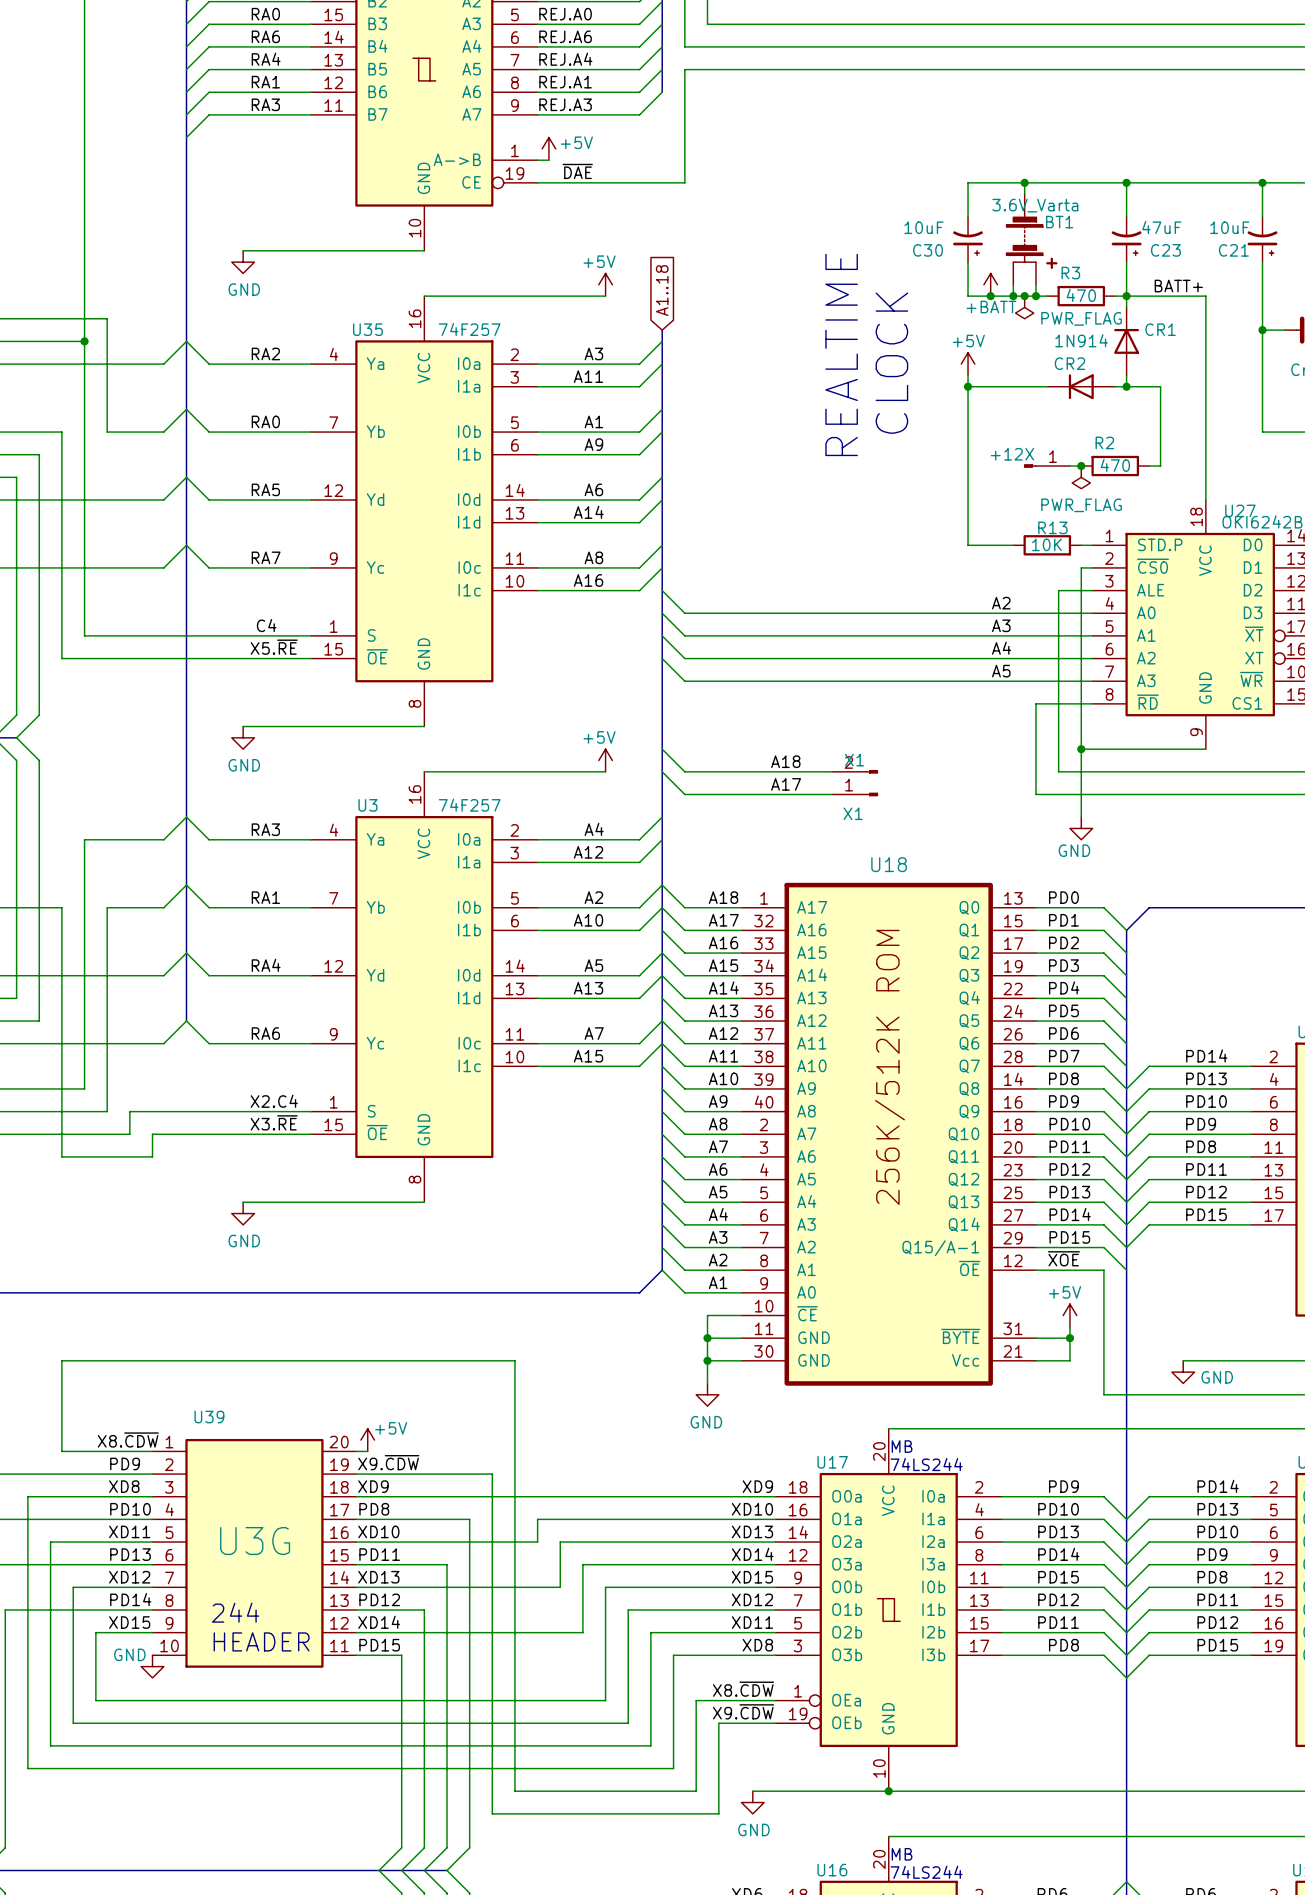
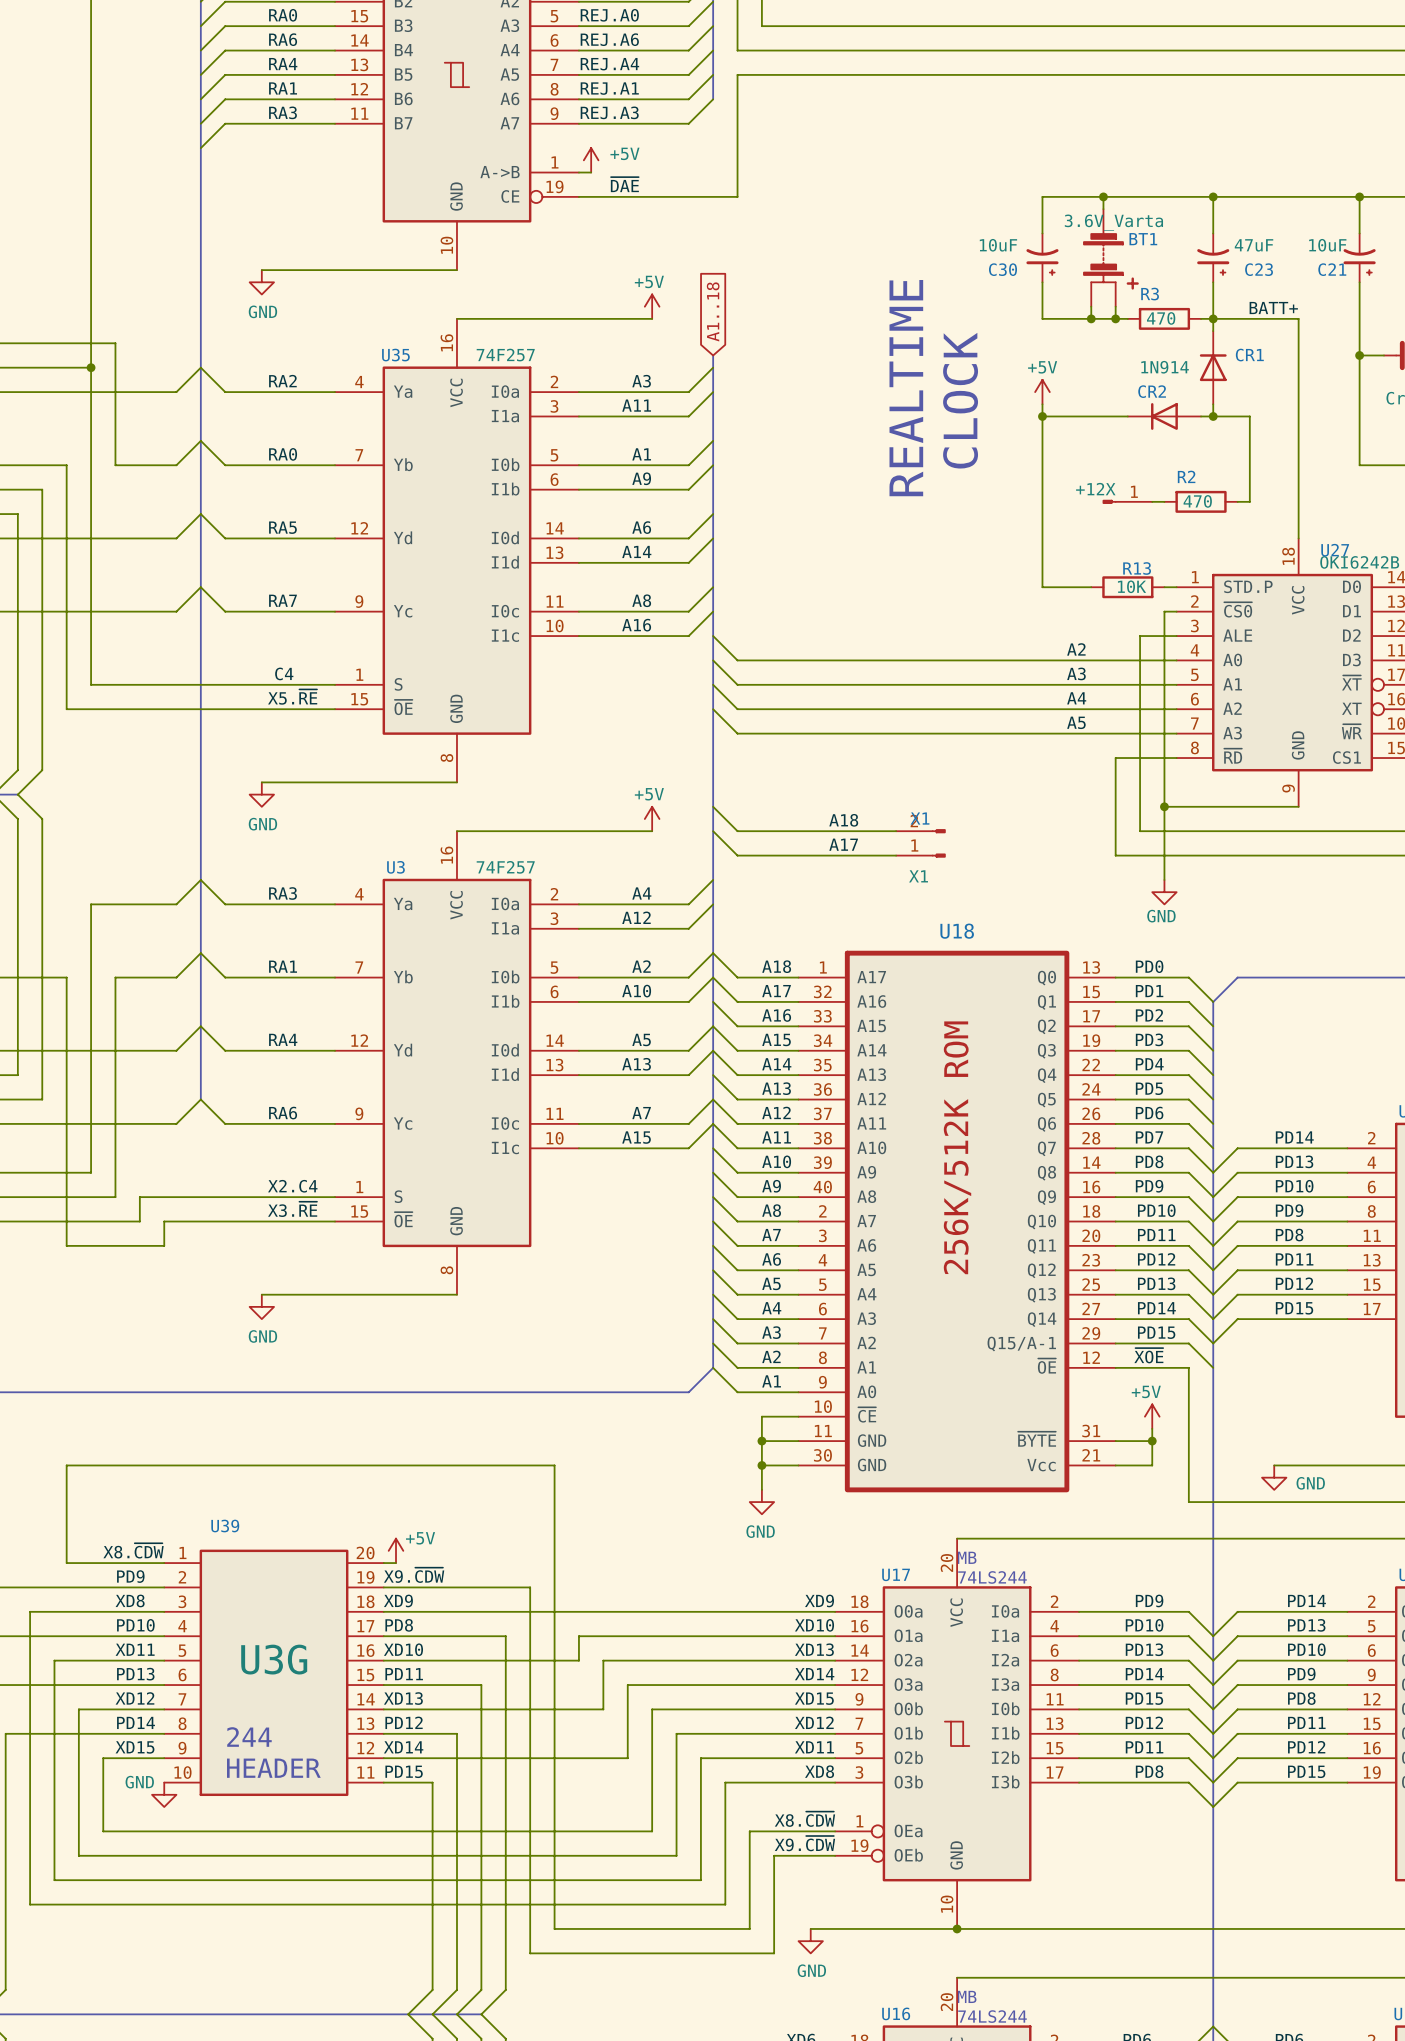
power symbol: +BATT (990, 284) -> none
junction: (990, 296) -> none
junction: (1024, 296) -> none
power symbol: PWR_FLAG (1024, 307) -> none
junction: (1081, 466) -> none
power symbol: PWR_FLAG (1081, 477) -> none

